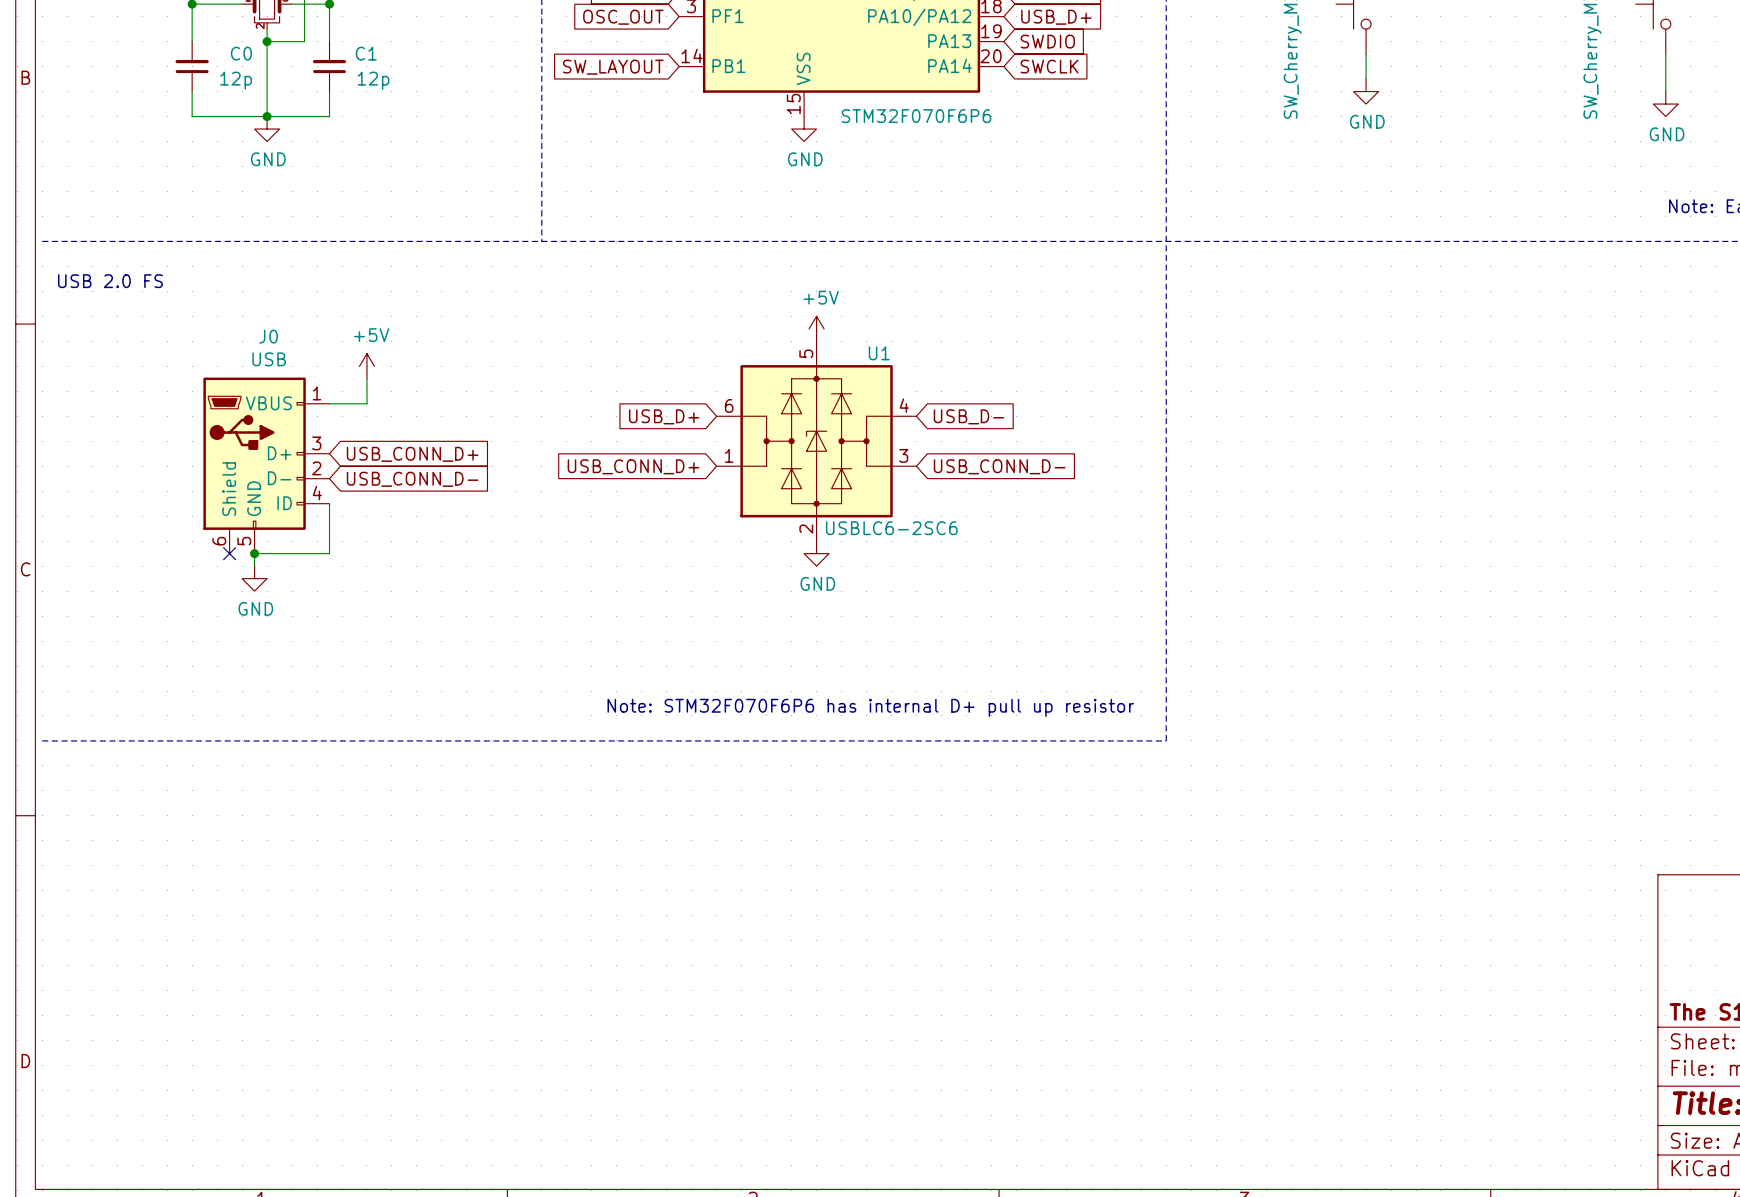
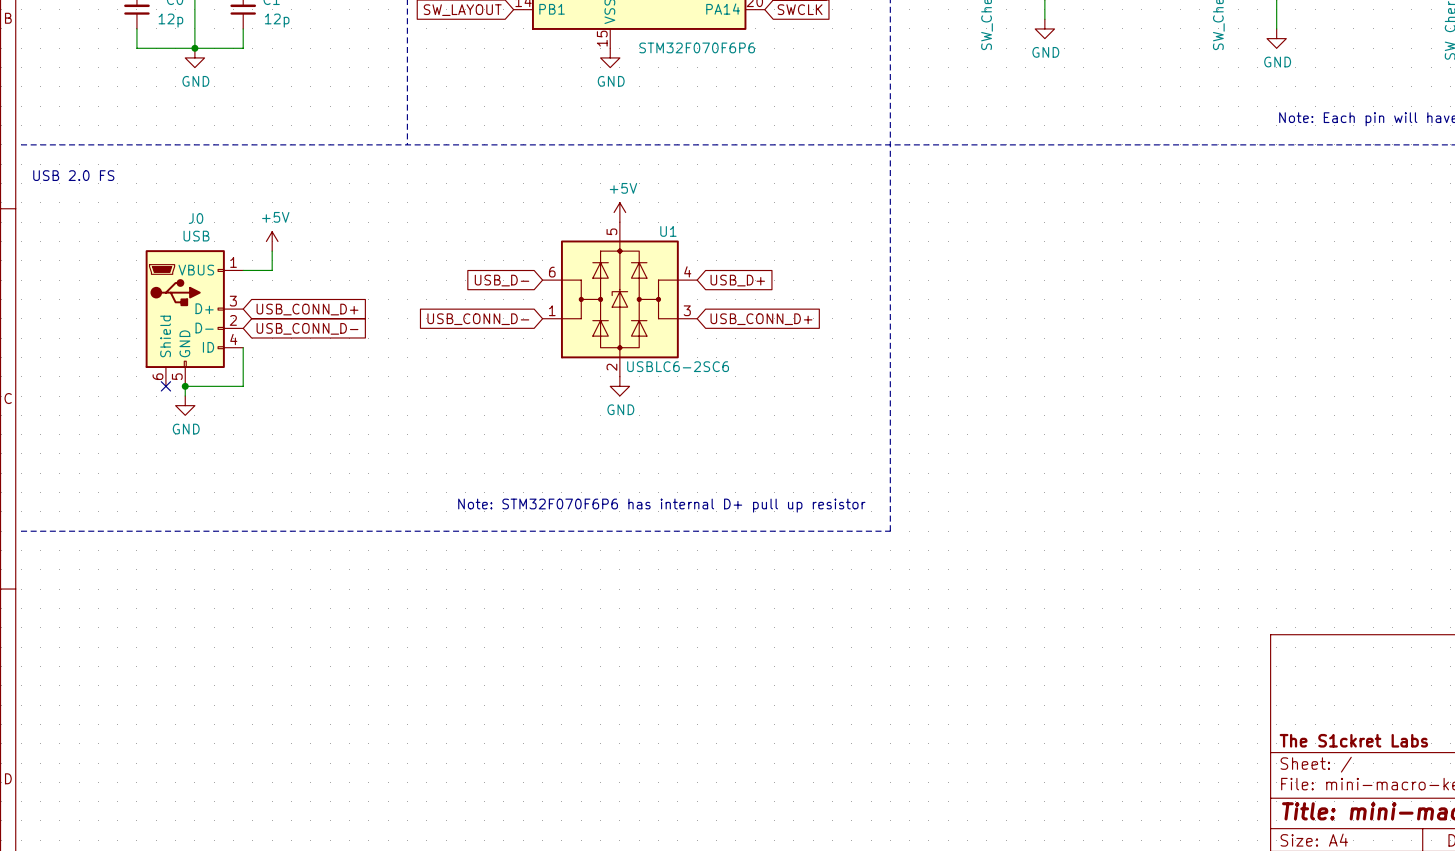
global label: USB_D+ (664, 416) -> USB_D- (502, 280)
global label: USB_D- (968, 416) -> USB_D+ (737, 280)
global label: USB_CONN_D+ (633, 466) -> USB_CONN_D- (478, 319)
global label: USB_CONN_D- (999, 466) -> USB_CONN_D+ (761, 319)

